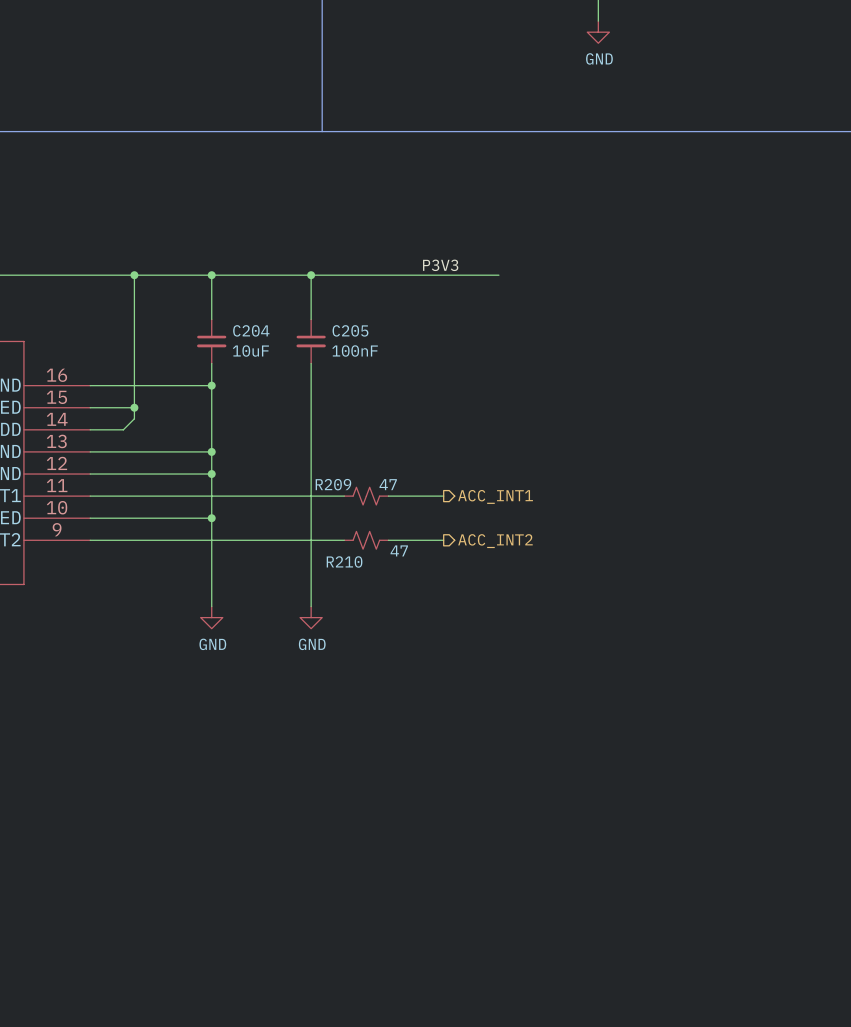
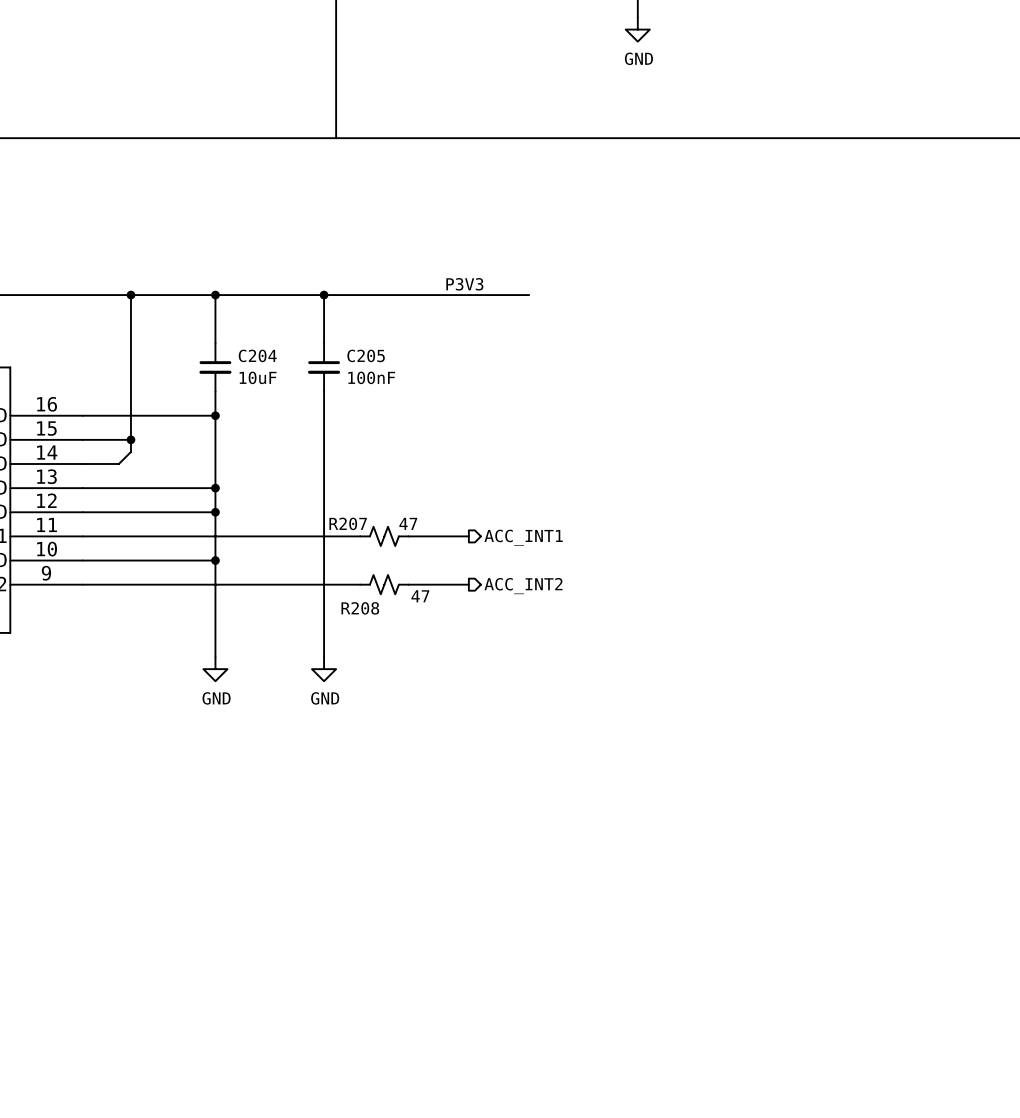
R209 name: R209 (333, 484) -> R207 (348, 523)
R210 name: R210 (344, 561) -> R208 (360, 608)

